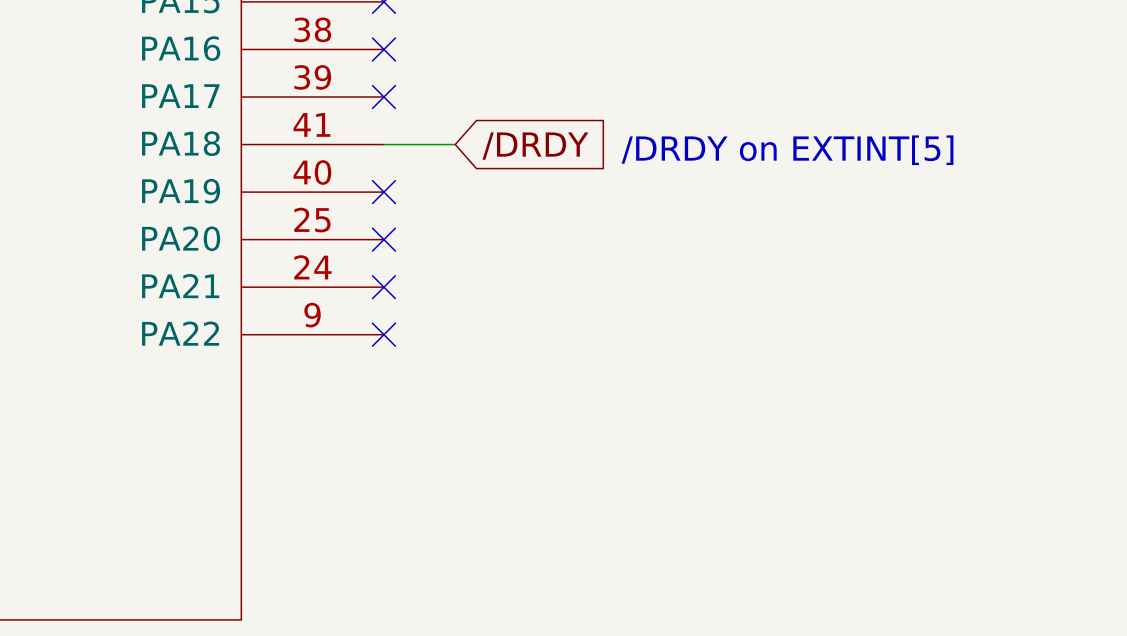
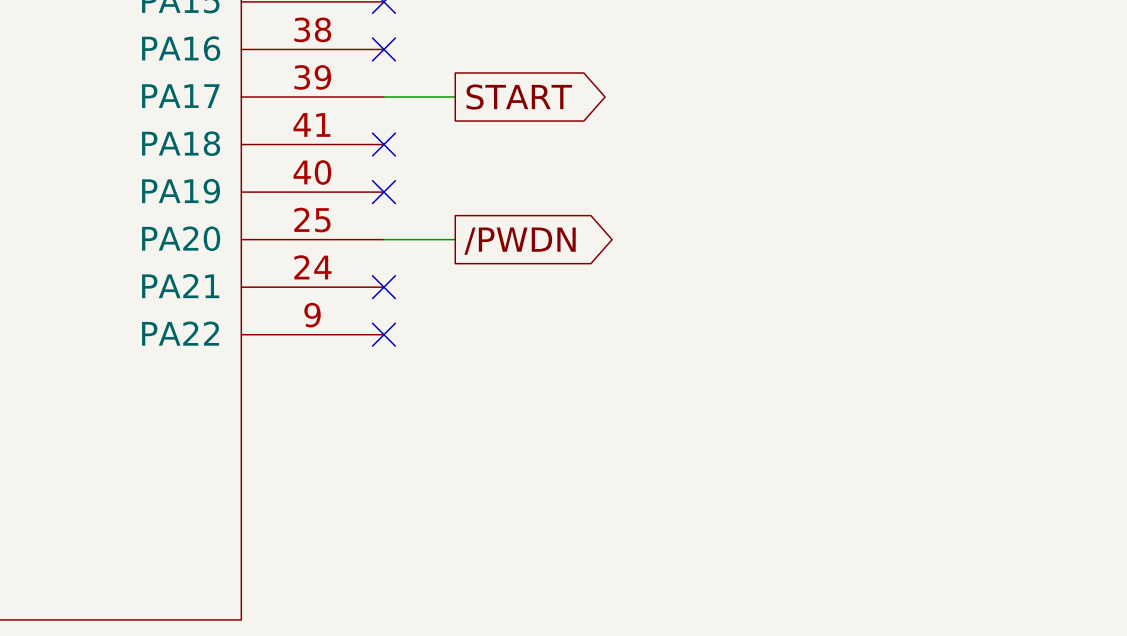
no-connect mark: (383, 97) -> none
global label: none -> START (519, 97)
wire: (383, 144) (455, 144) -> (383, 97) (455, 97)
no-connect mark: none -> (383, 144)
global label: /DRDY (535, 146) -> none
text: /DRDY on EXTINT[5] (787, 150) -> none
wire: none -> (383, 239) (455, 239)
no-connect mark: (383, 239) -> none
global label: none -> /PWDN (520, 241)

